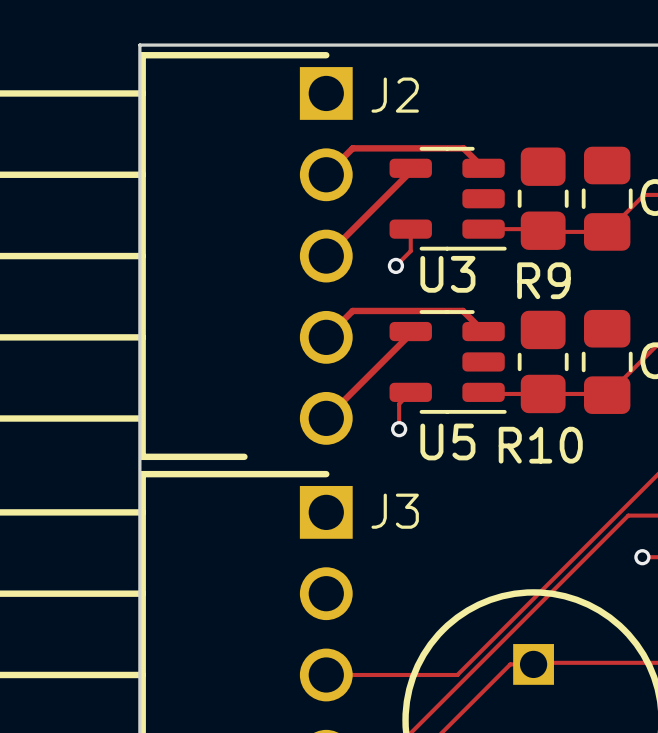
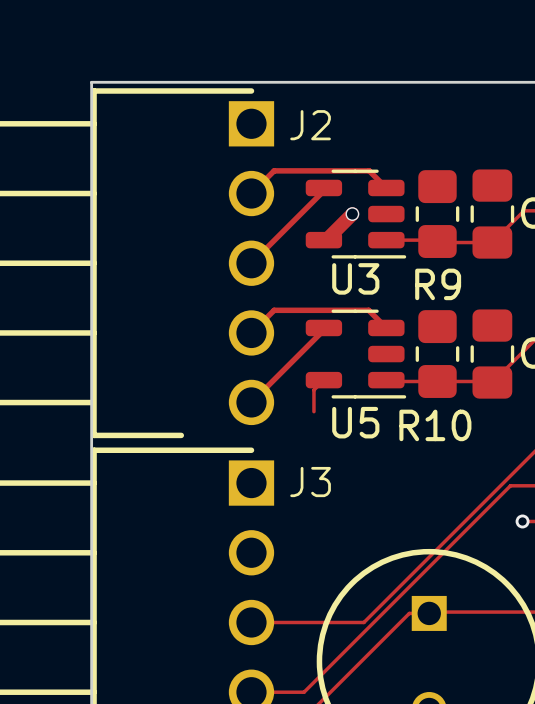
via: none -> (352, 214)
track: (410, 229) (410, 251) (395, 265) -> (323, 240) (326, 240) (352, 214)
via: (395, 265) -> none
via: (399, 429) -> none

